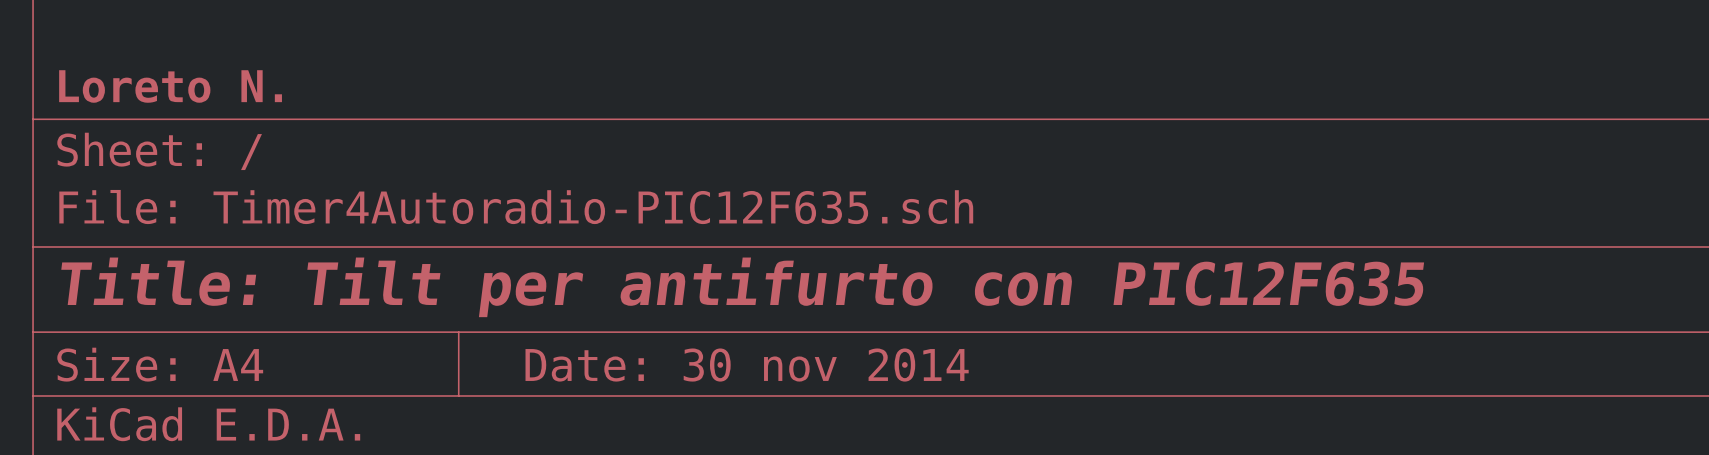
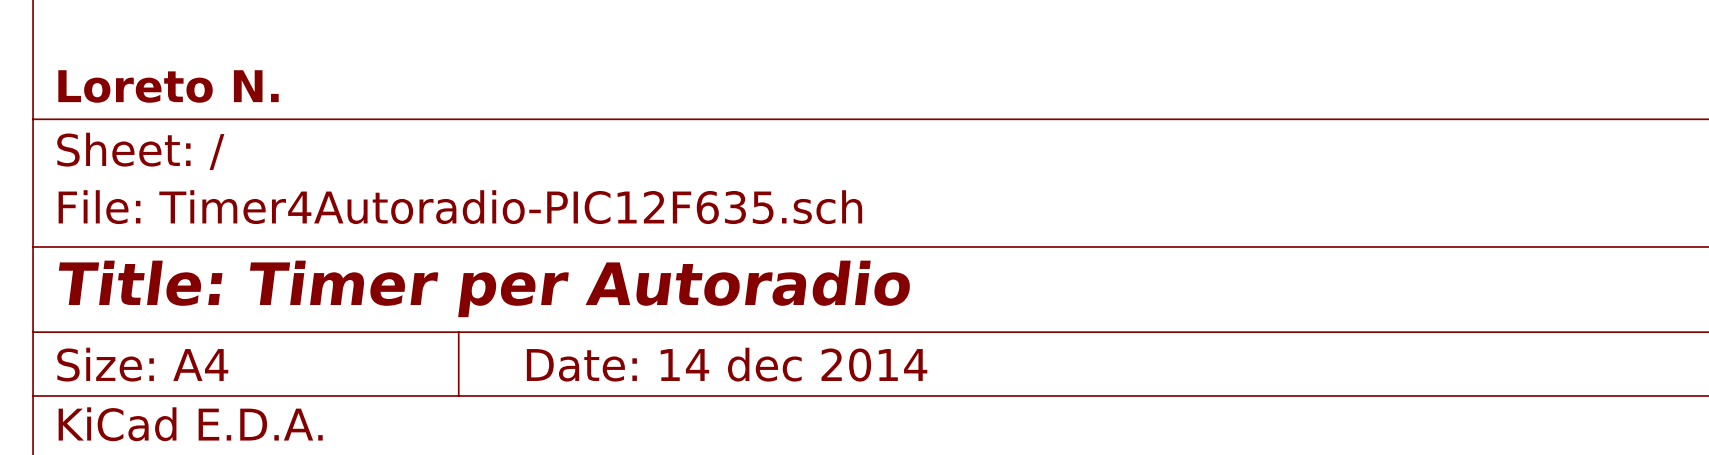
title block: Title: Tilt per antifurto con PIC12F635 (742, 287) -> Title: Timer per Autoradio (484, 288)
title block: Date: 30 nov 2014 (747, 365) -> Date: 14 dec 2014 (727, 364)

